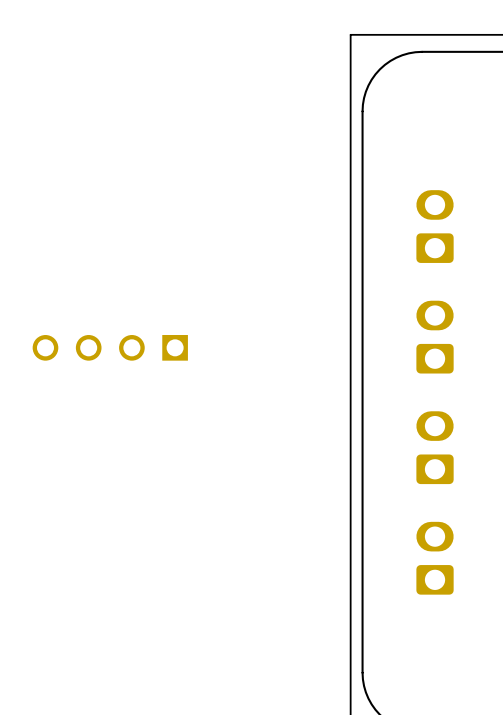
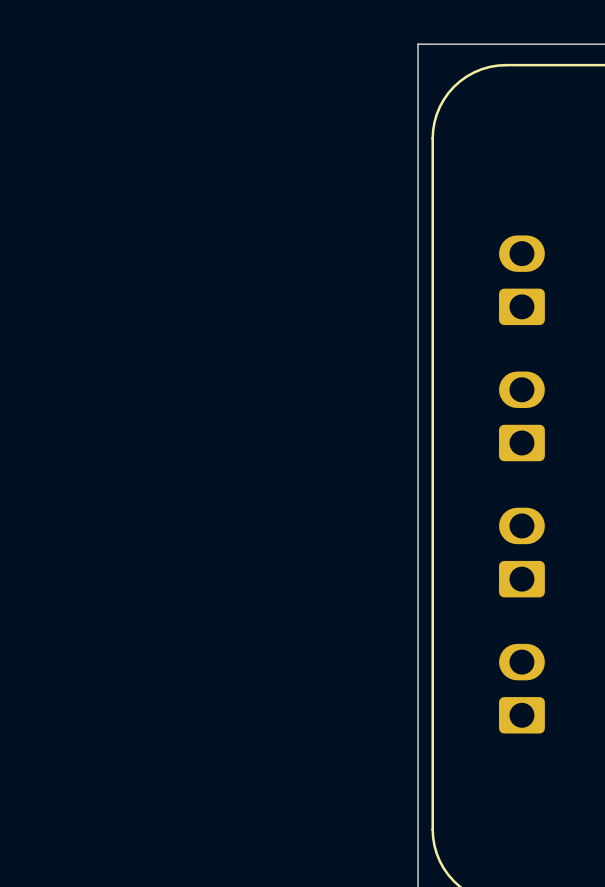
part: (110, 347) -> none

